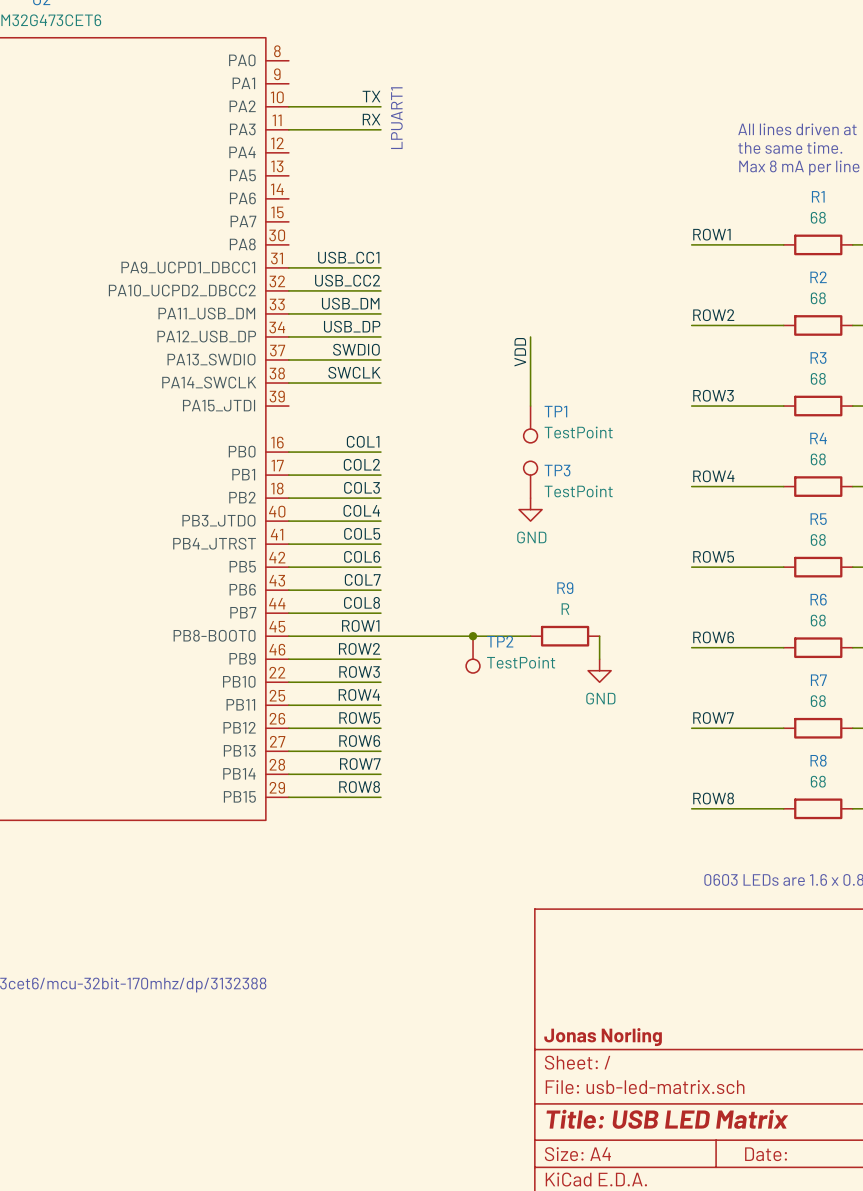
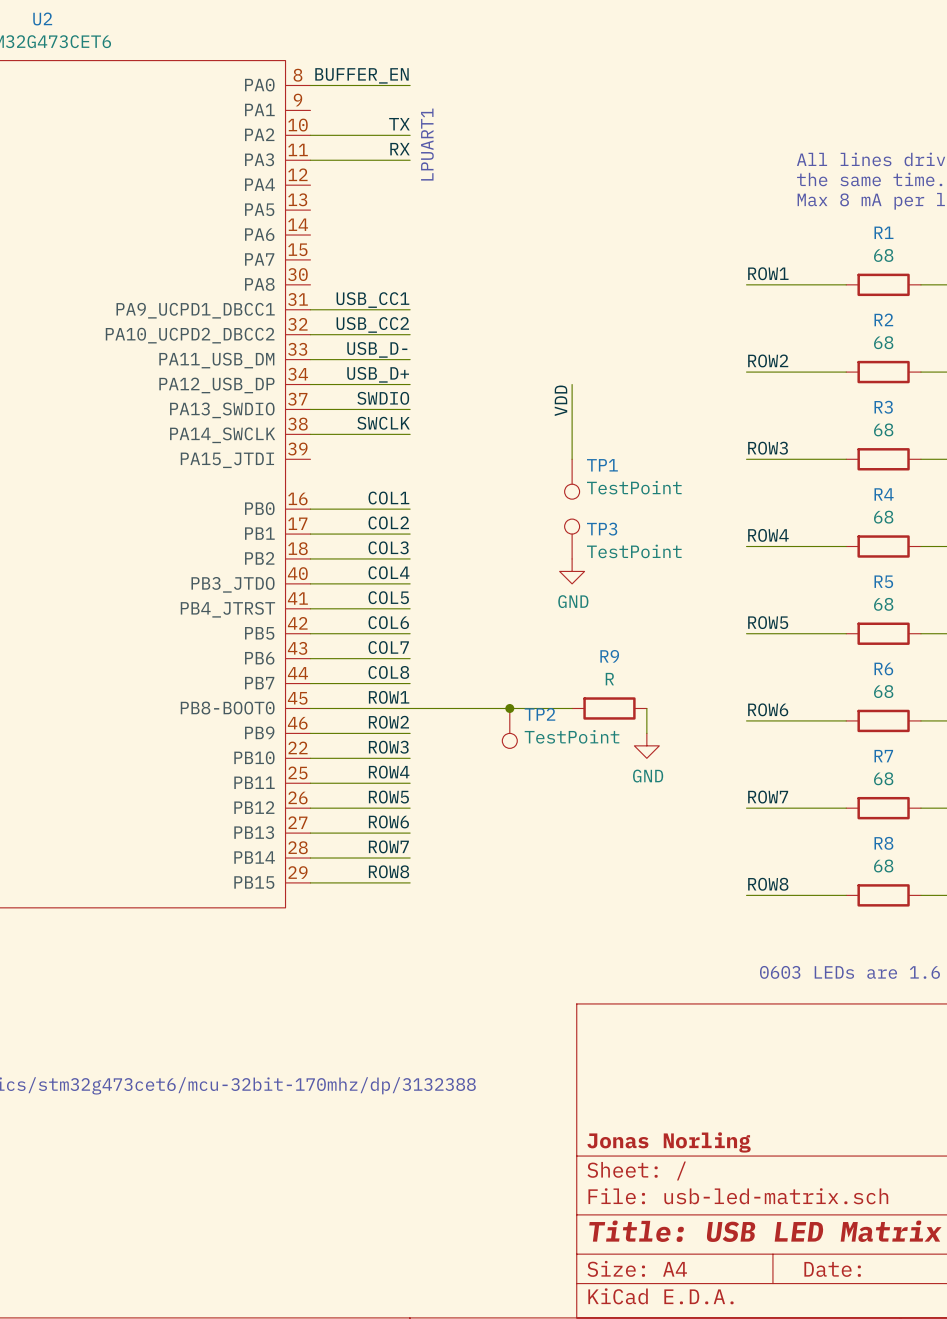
label: none -> BUFFER_EN (361, 75)
wire: none -> (310, 85) (410, 85)
label: USB_DM (350, 303) -> USB_D- (377, 349)
label: USB_DP (352, 326) -> USB_D+ (378, 374)

